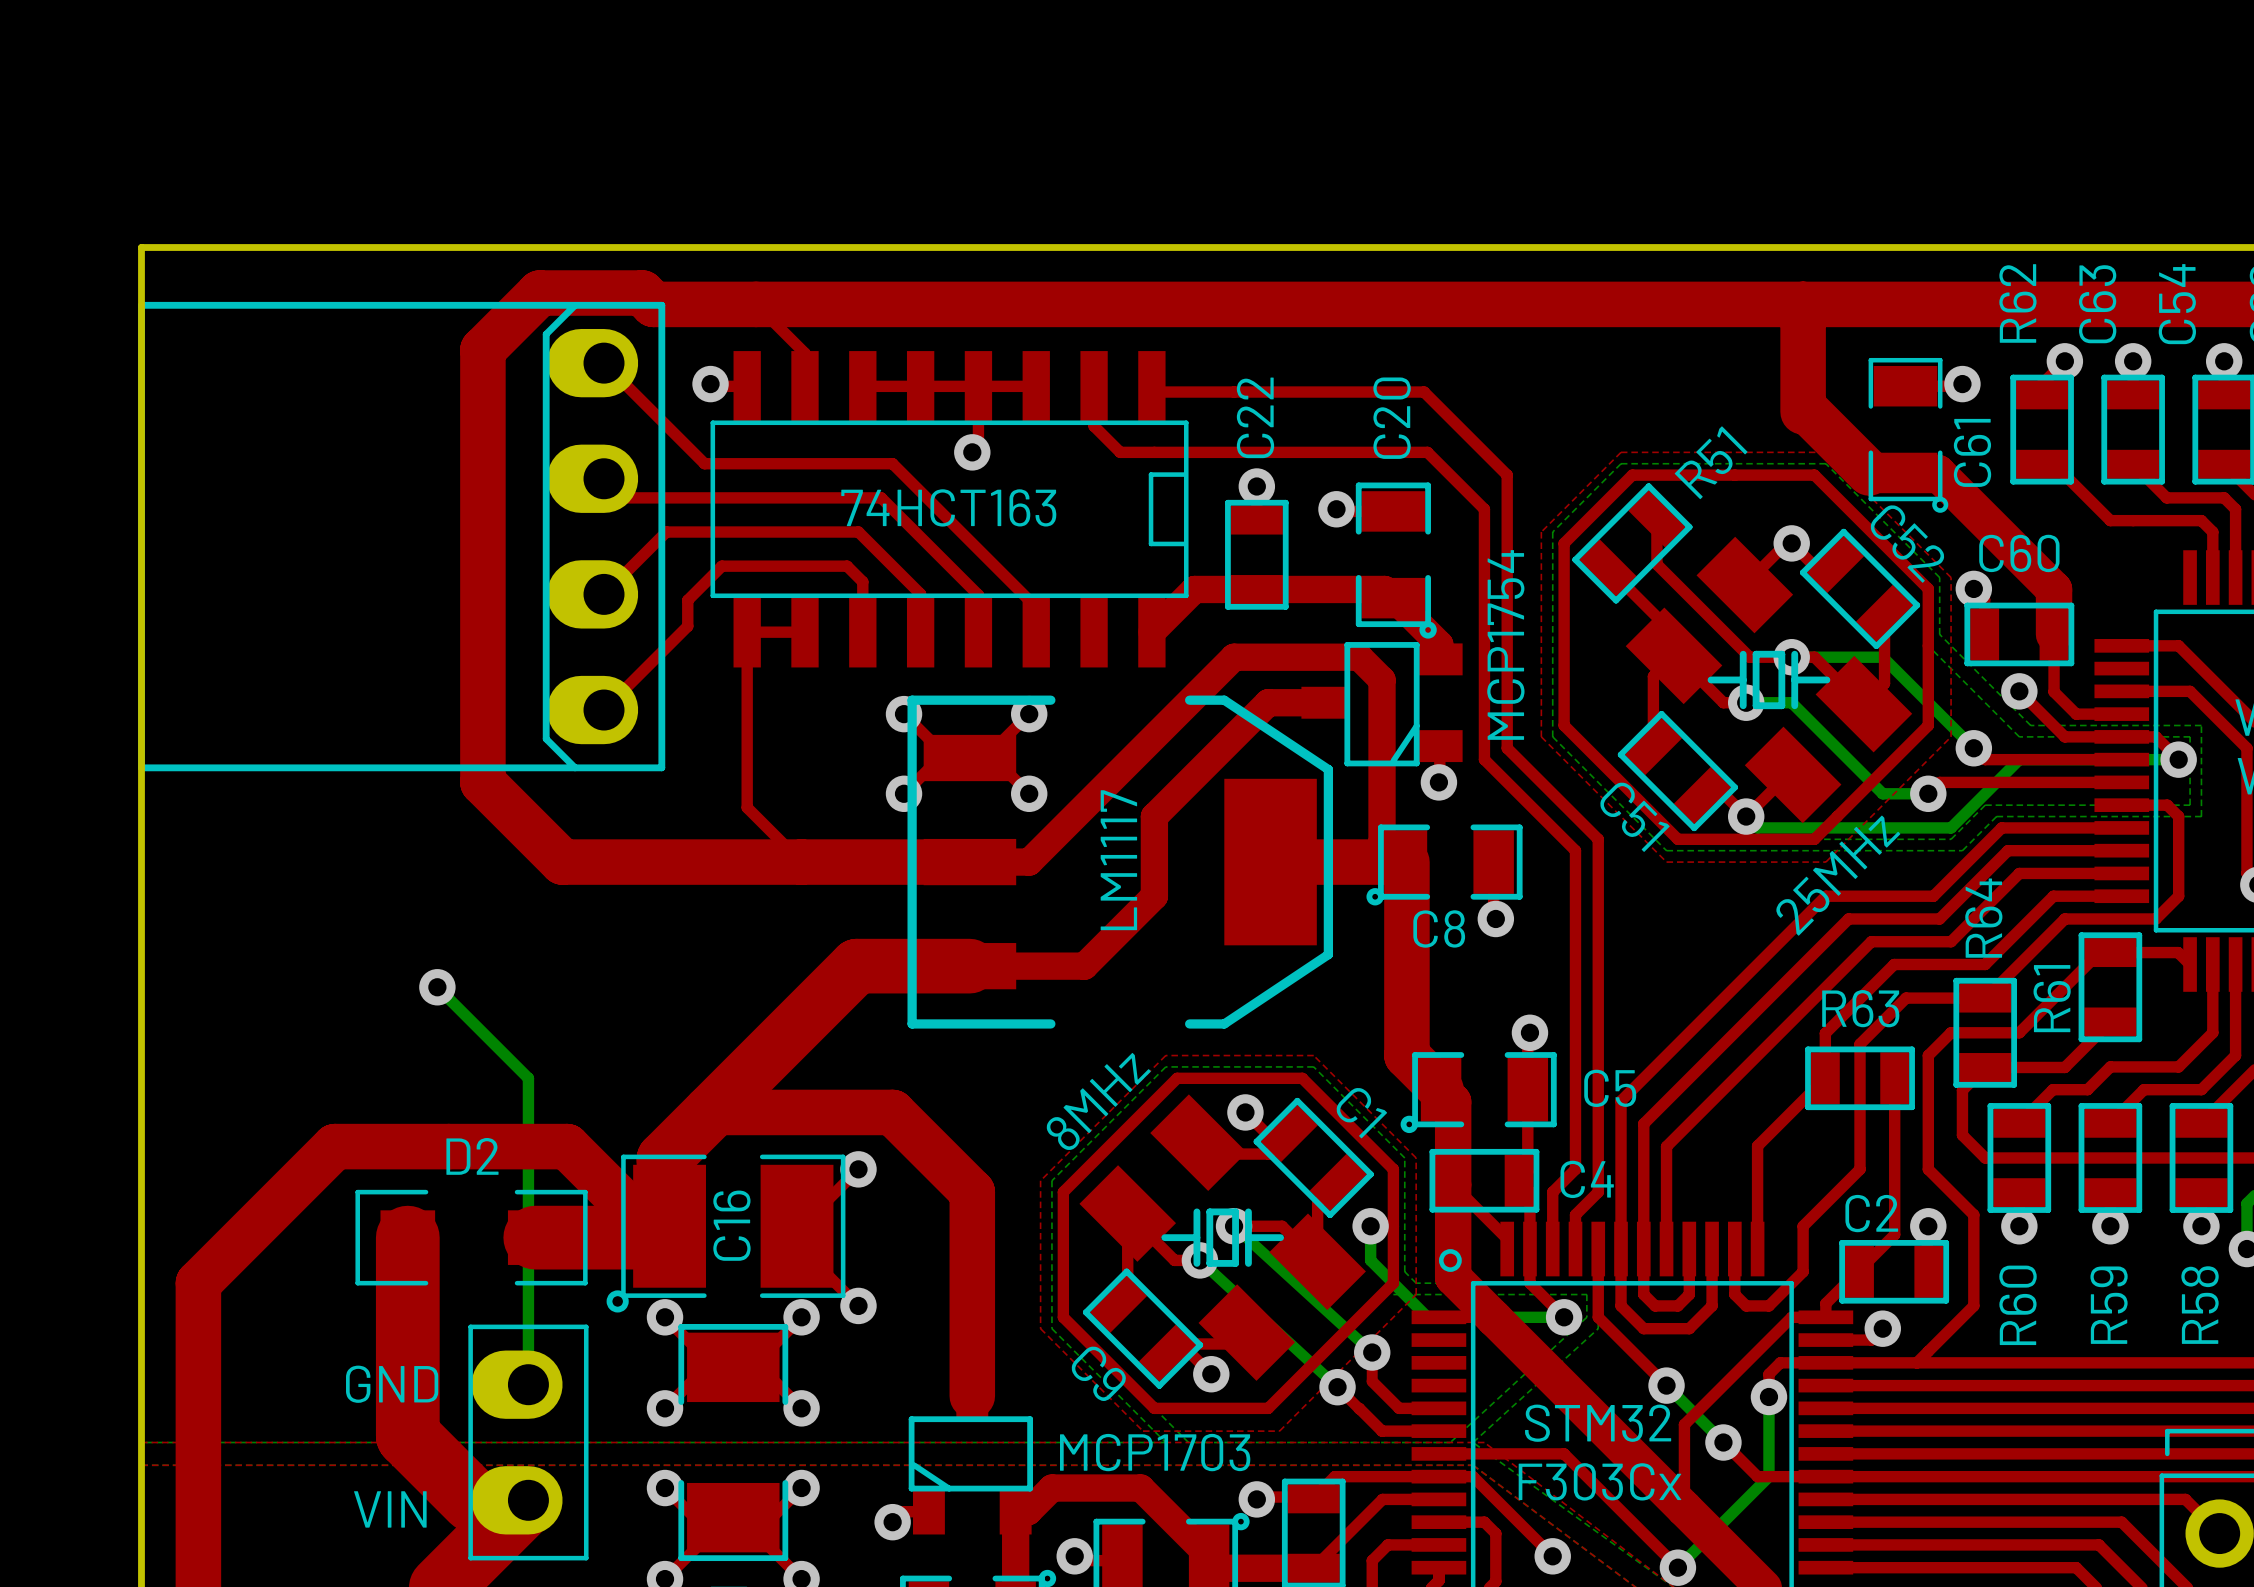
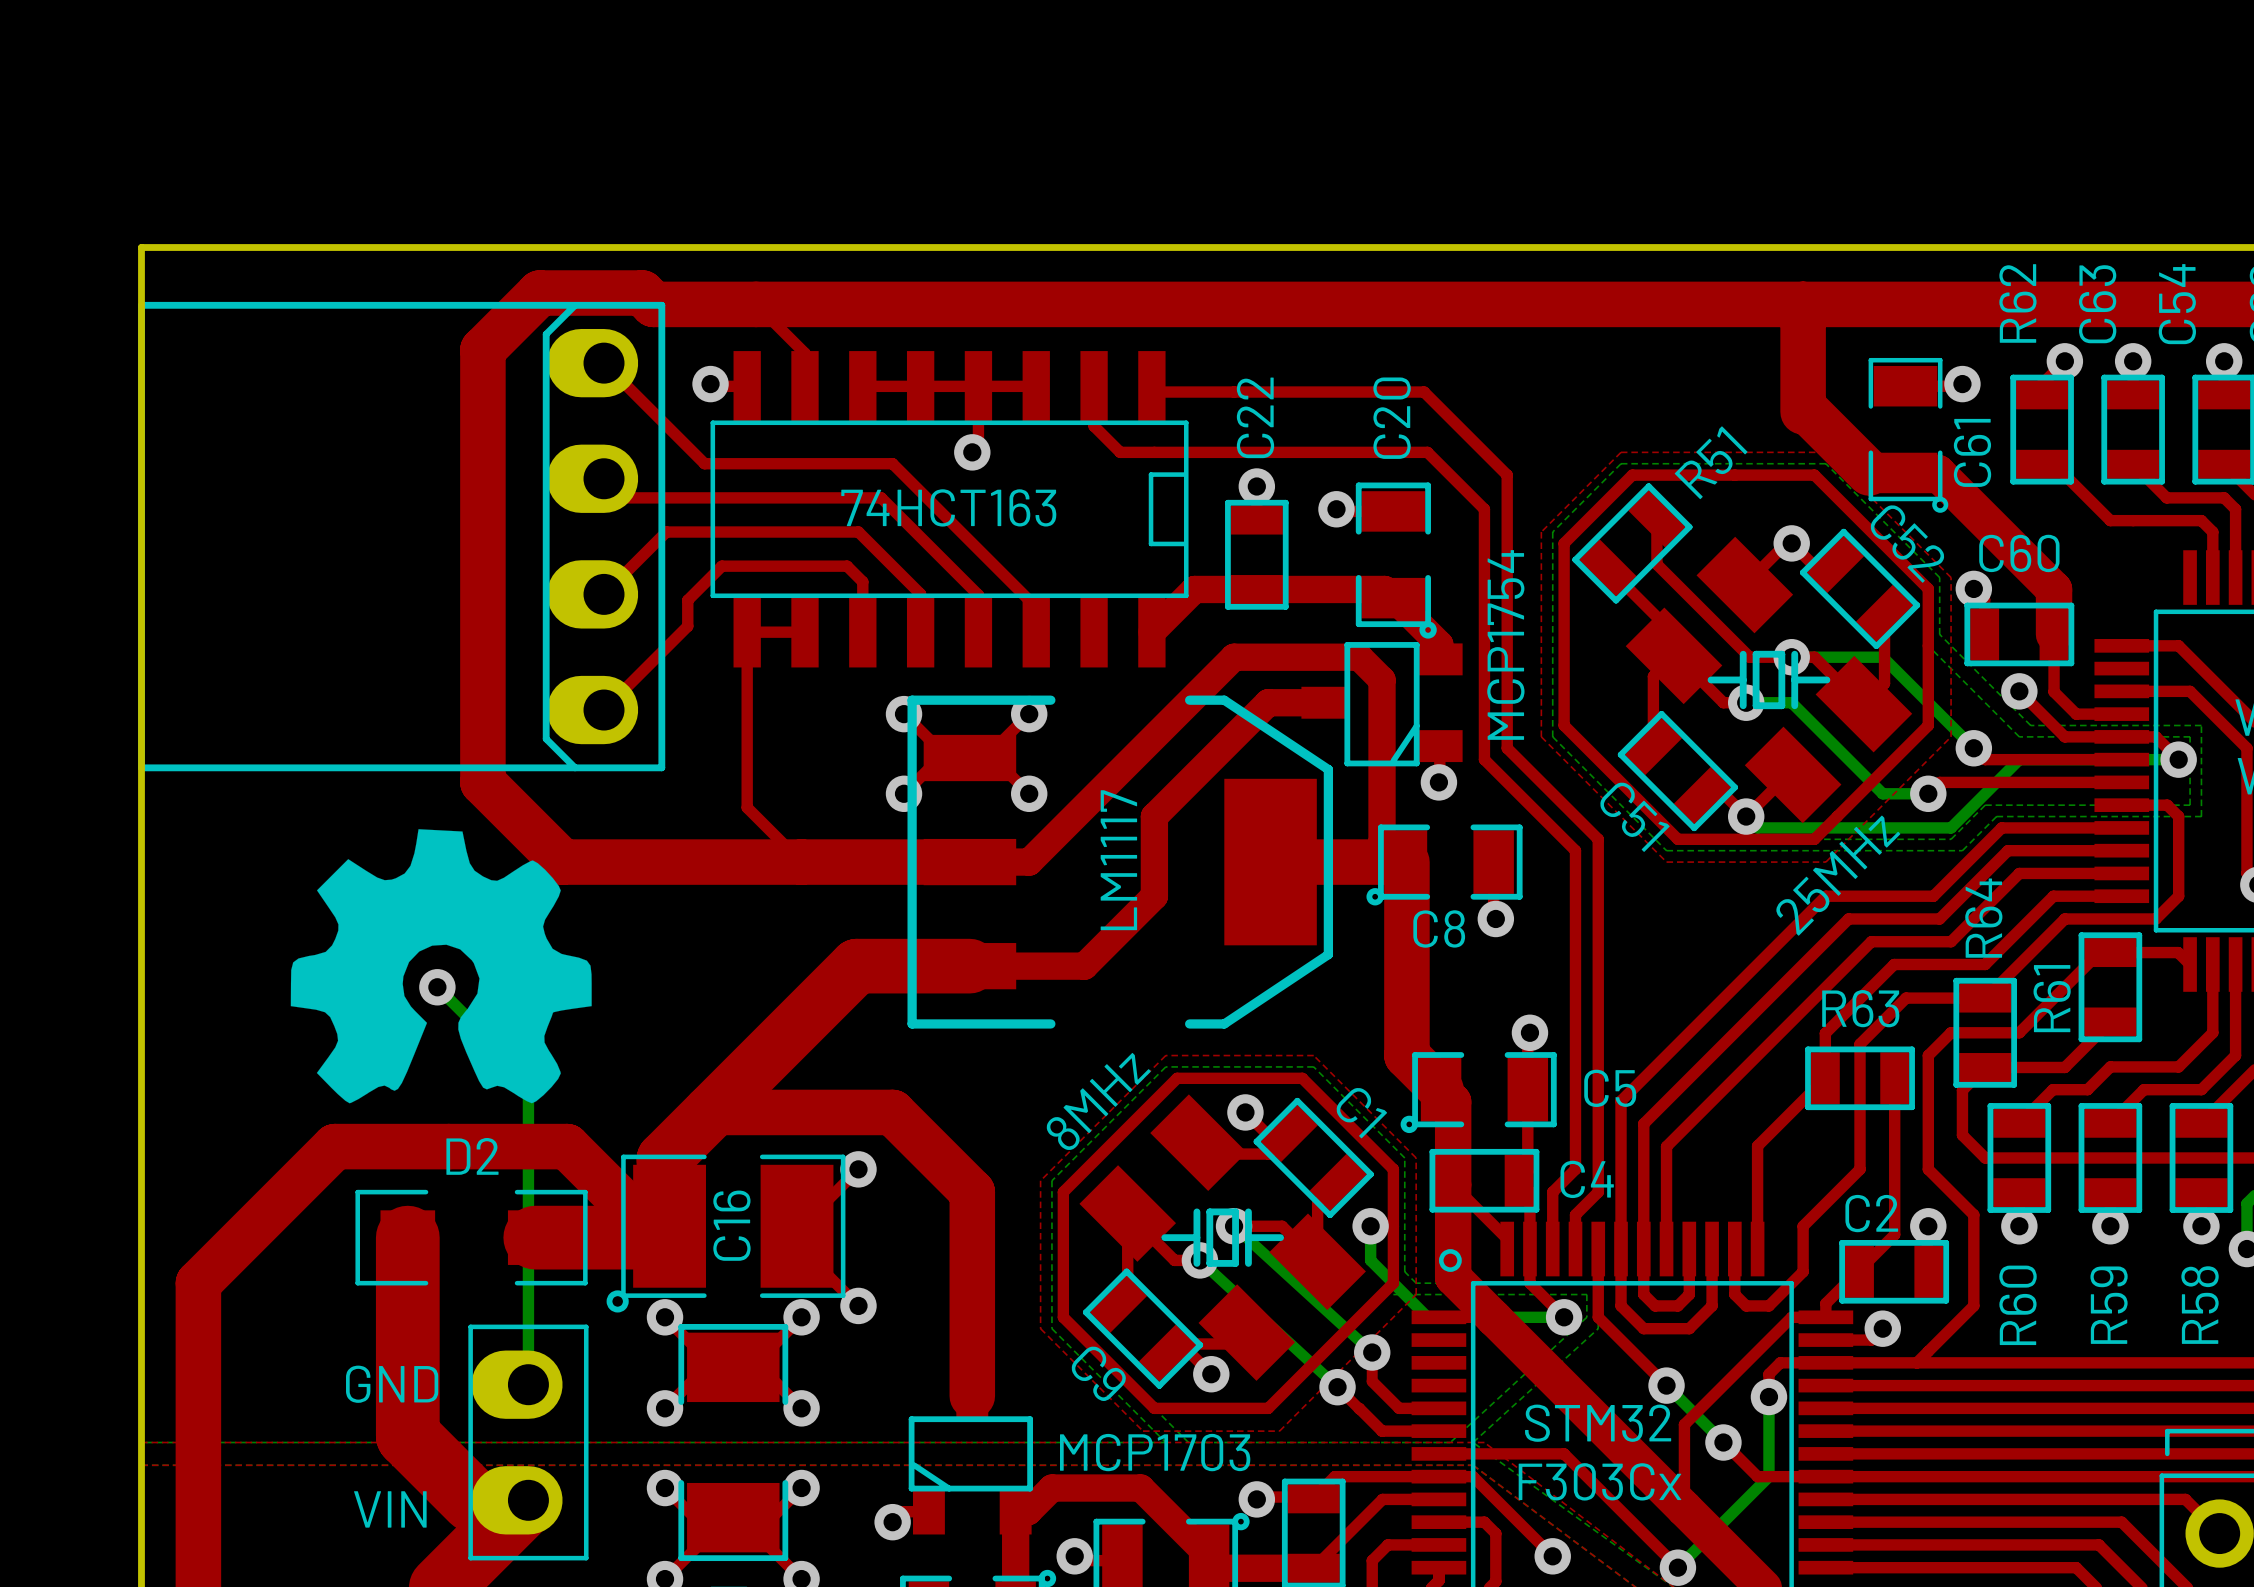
drawing: none -> [290, 829, 592, 1104]

